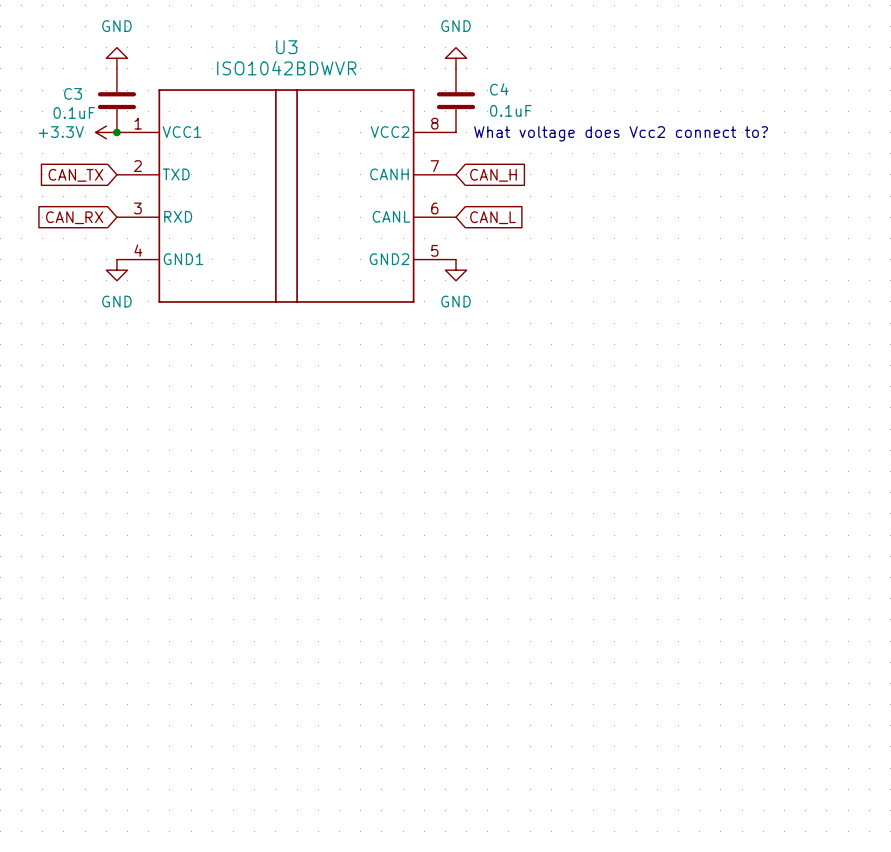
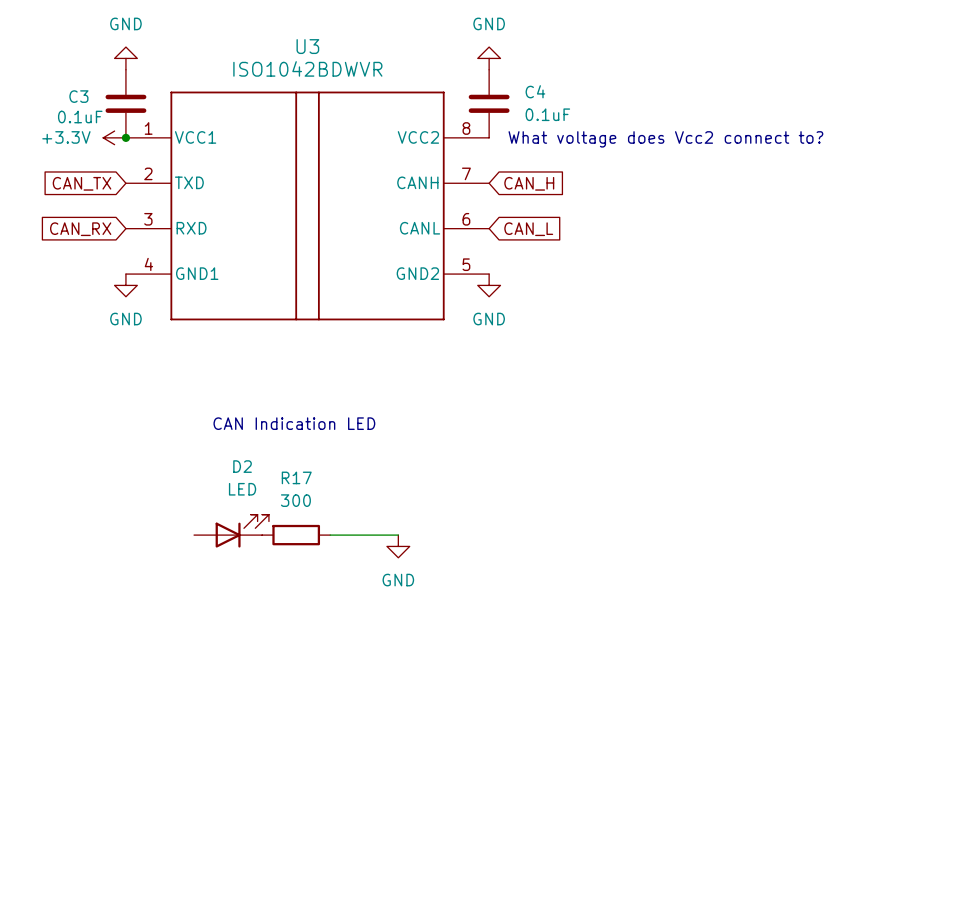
text: none -> CAN Indication LED (294, 423)
D2: none -> LED (231, 531)
R17: none -> 300 (296, 535)
wire: none -> (330, 535) (398, 535)
power symbol: none -> GND (398, 546)

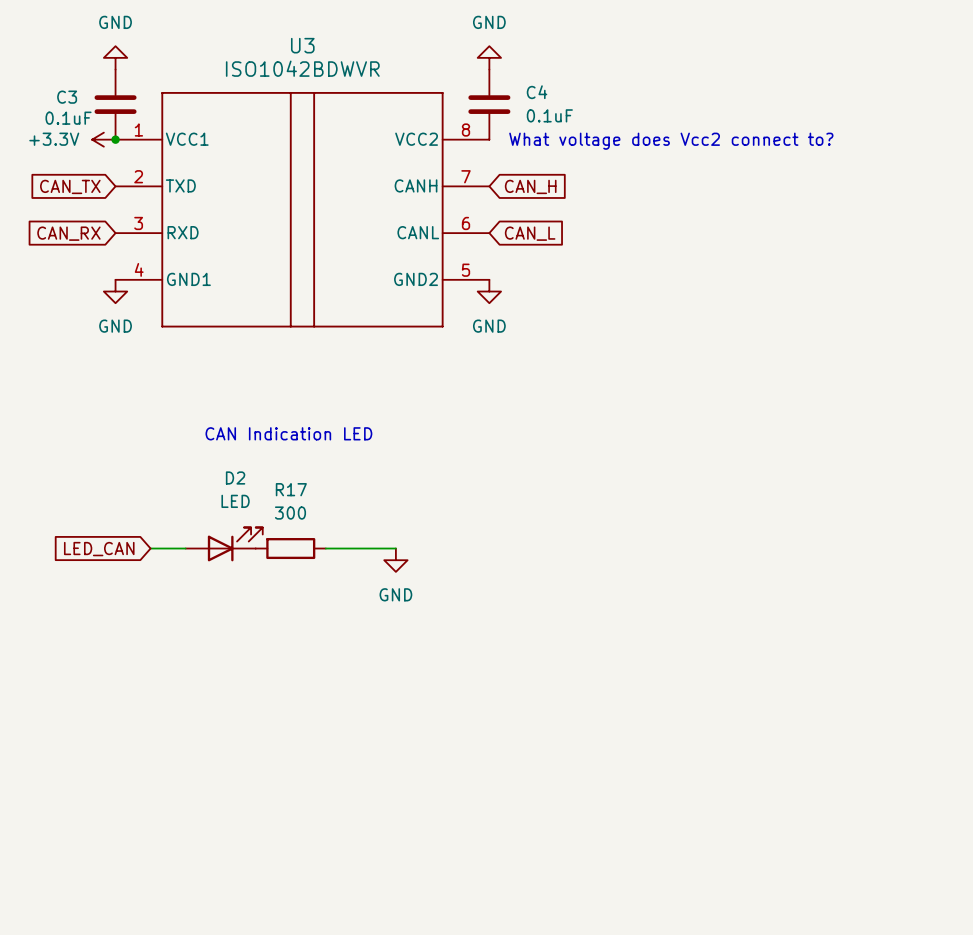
global label: none -> LED_CAN (99, 549)
wire: none -> (150, 548) (185, 548)

